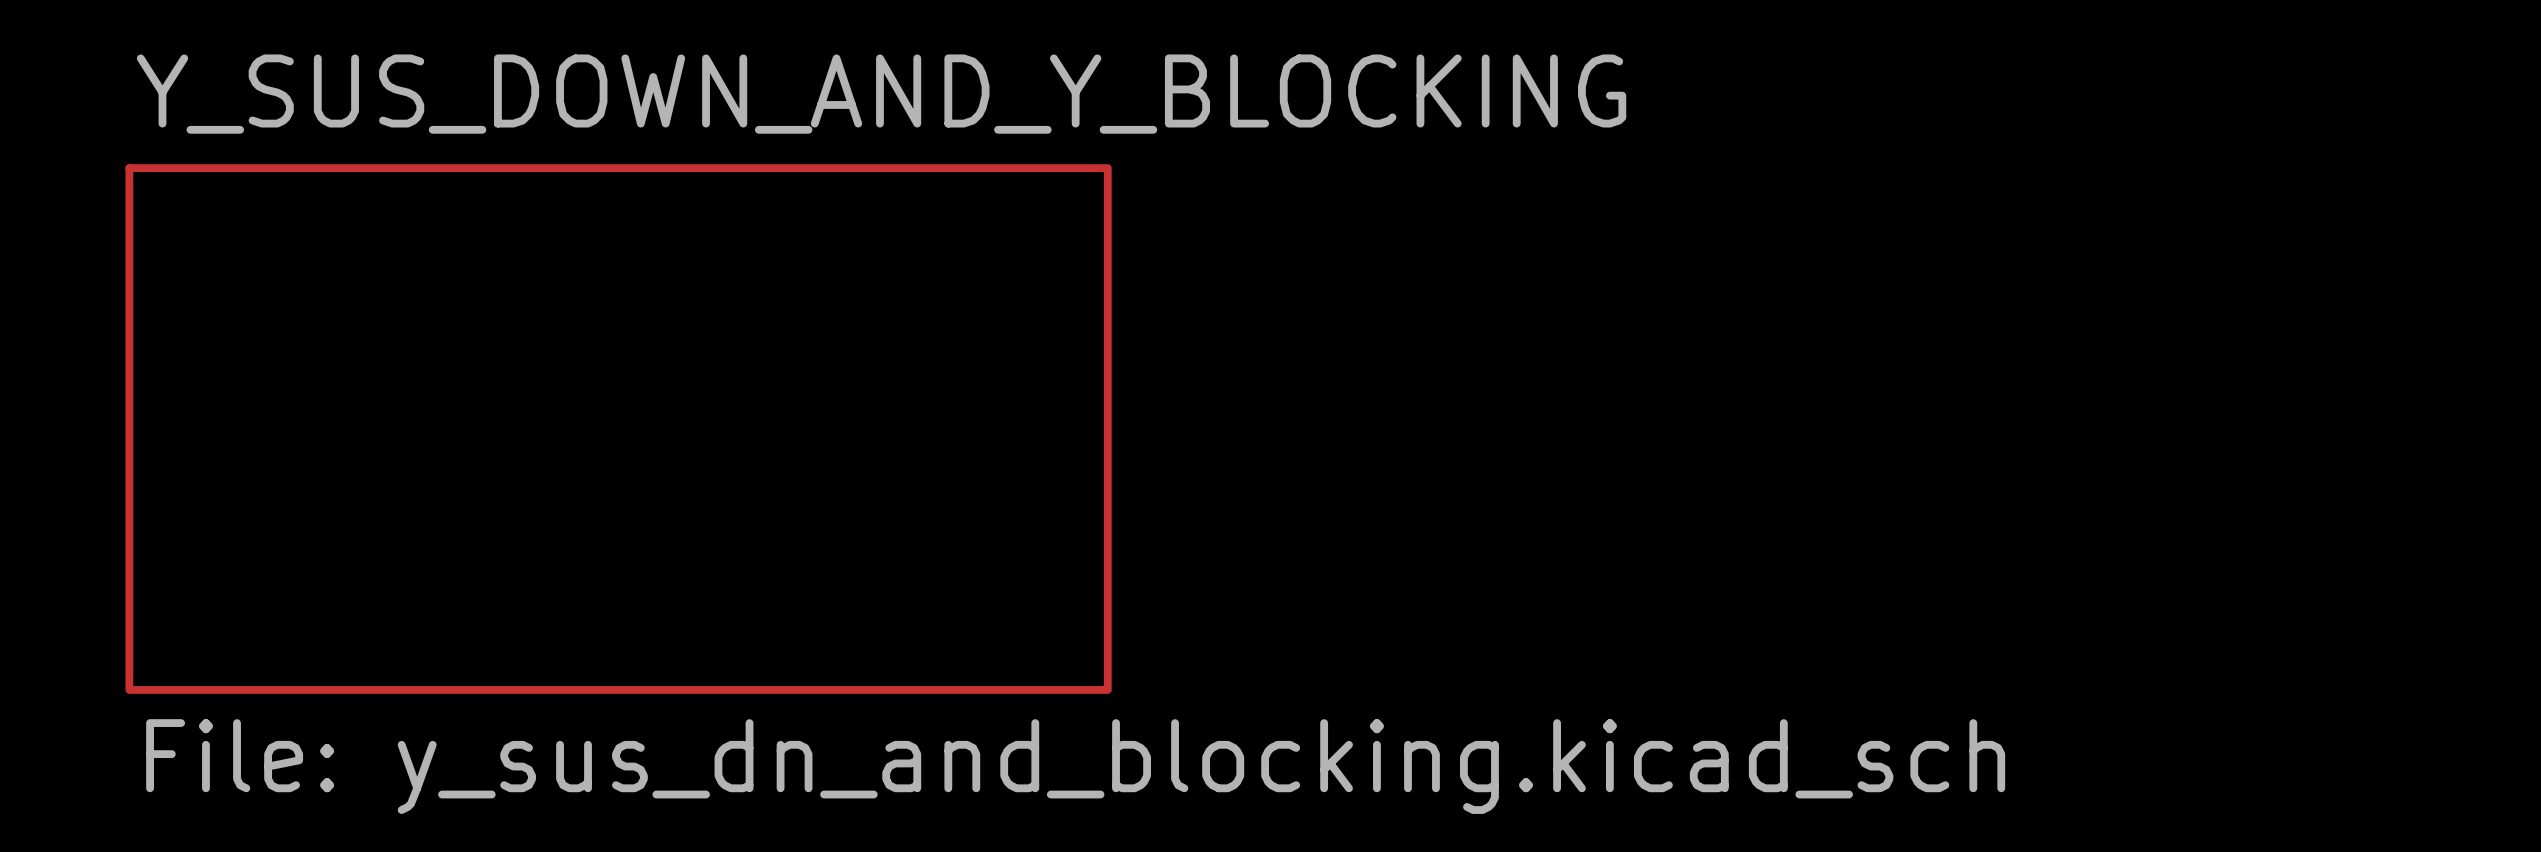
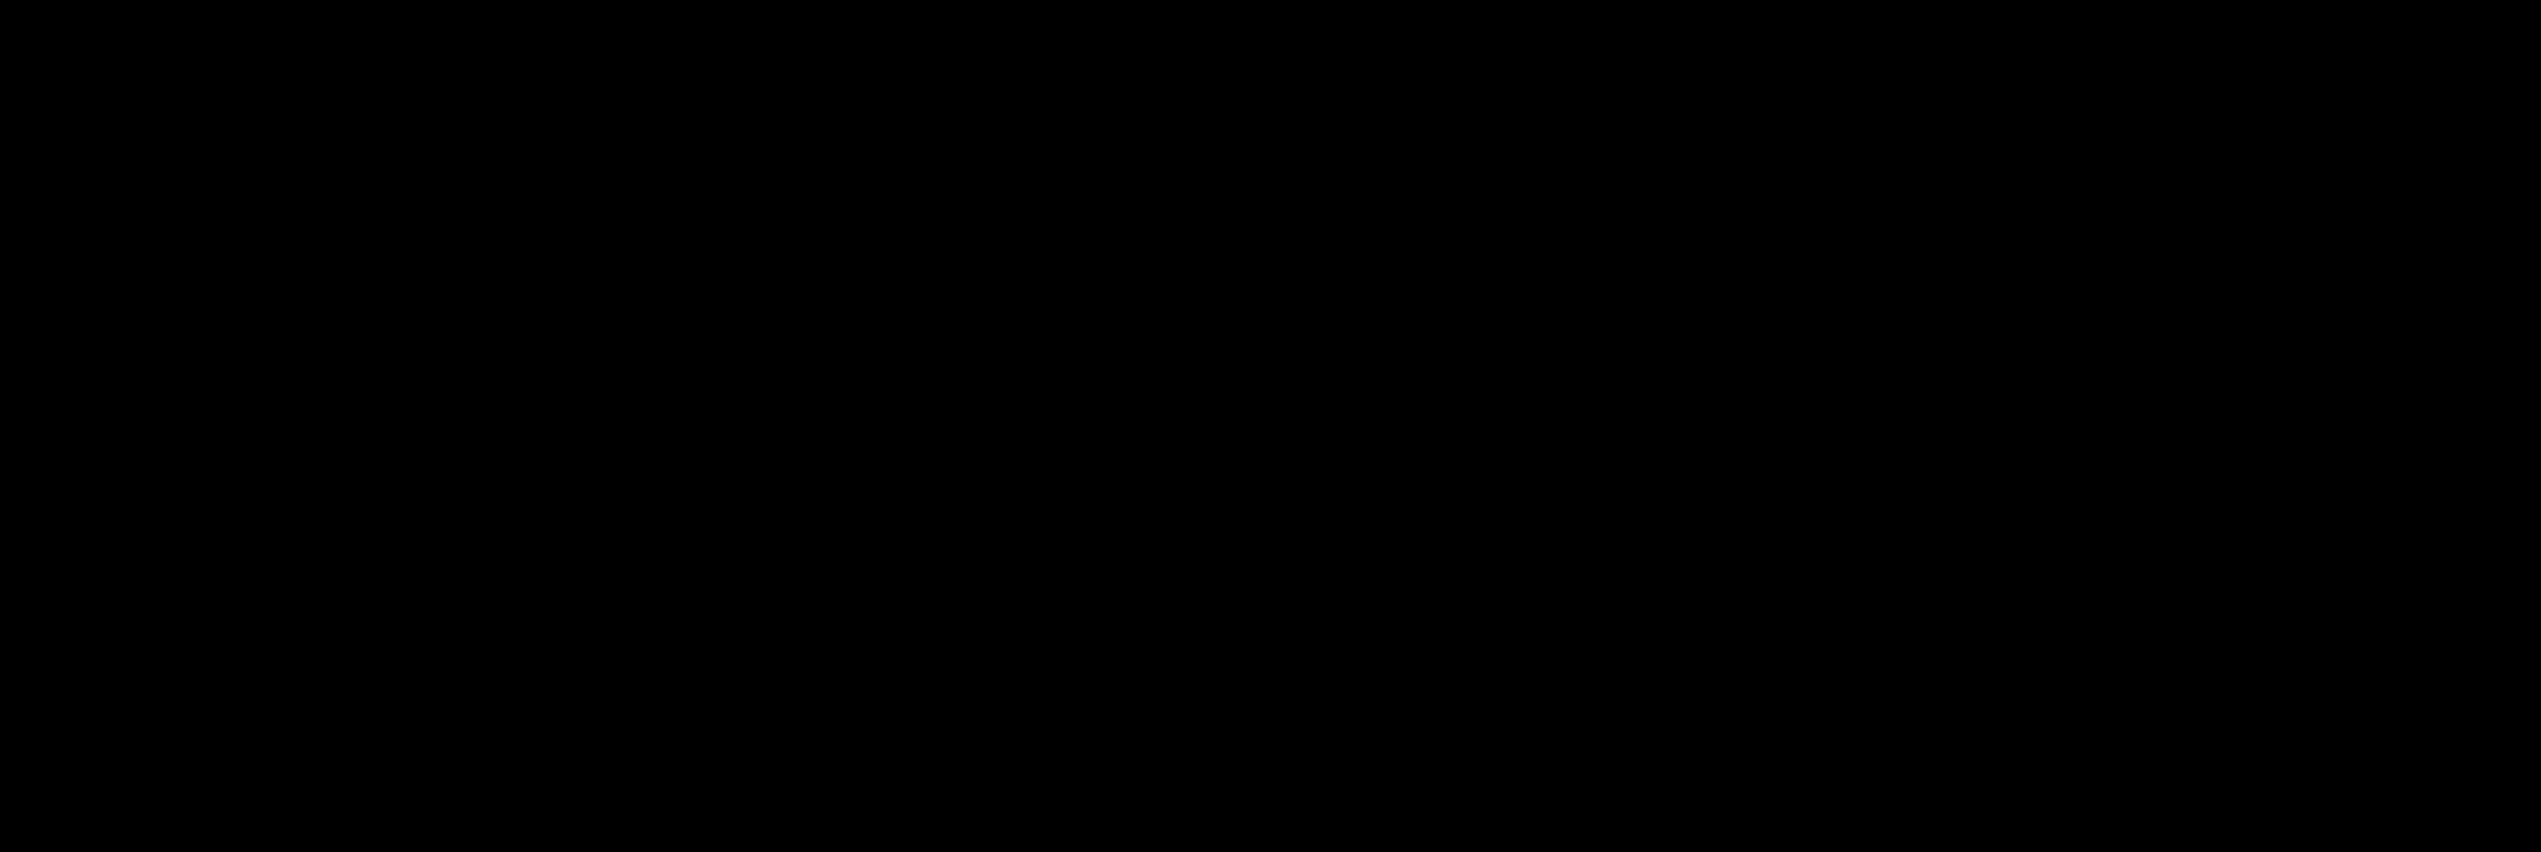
sheet Y_SUS_DOWN_AND_Y_BLOCKING: File: y_sus_dn_and_blocking.kicad_sch (618, 429) -> none

